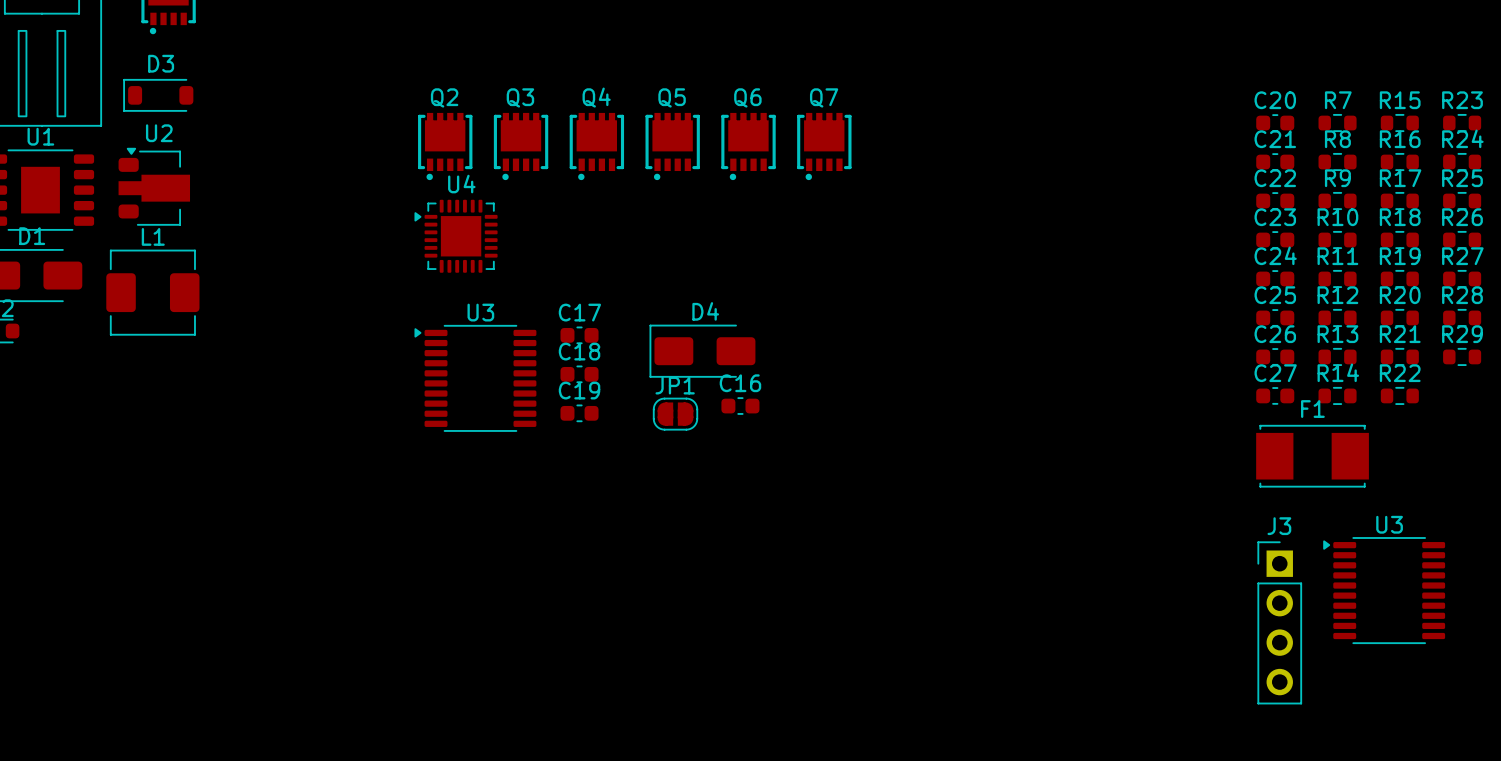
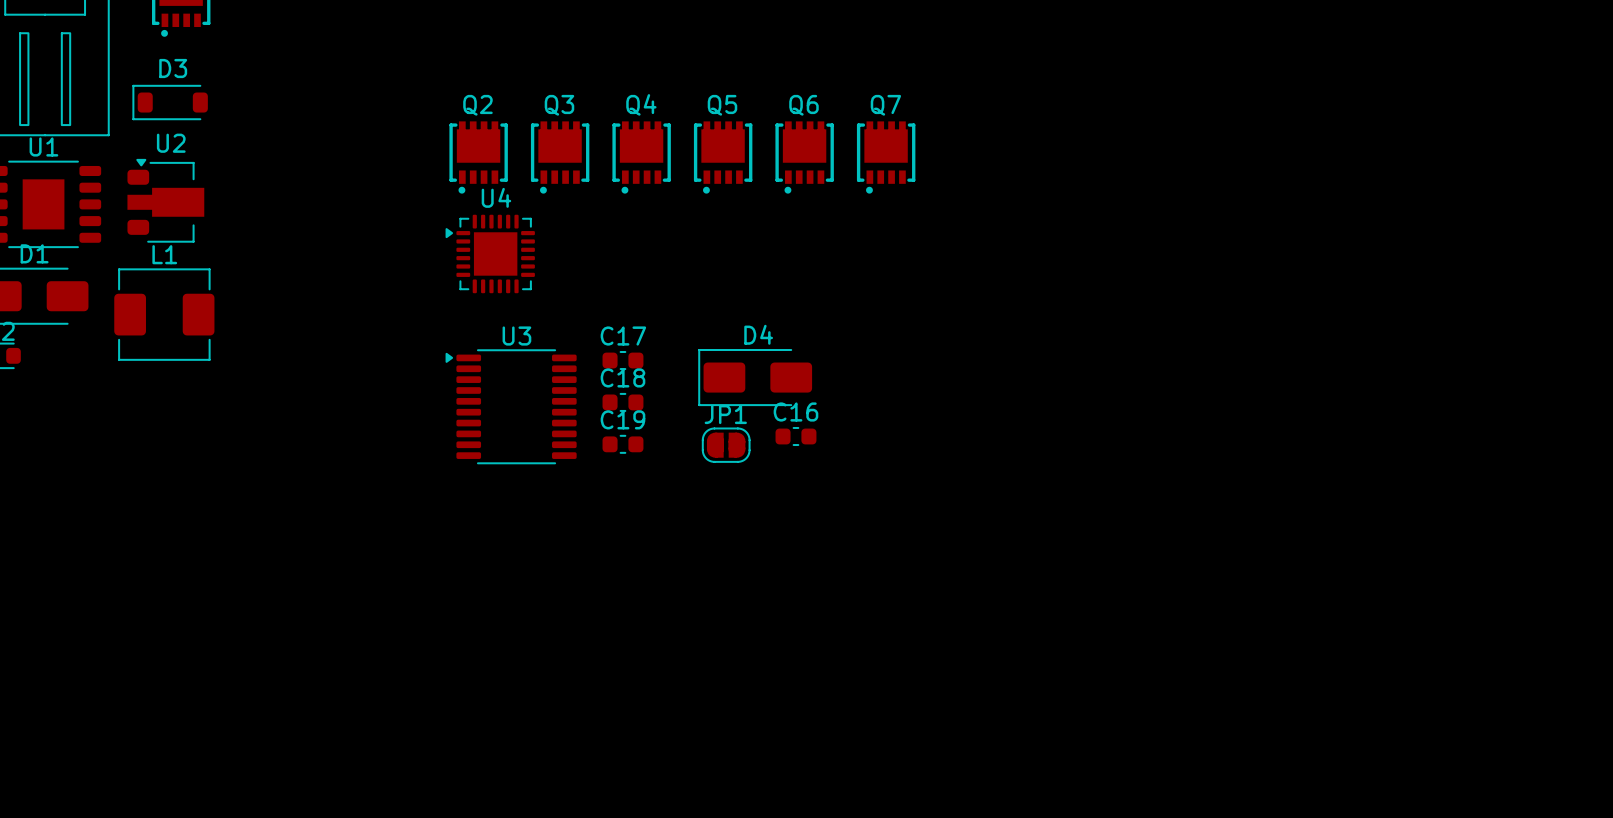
C20: (1275, 123) -> none
R7: (1337, 123) -> none
R15: (1399, 123) -> none
R23: (1462, 123) -> none
C21: (1275, 162) -> none
R8: (1337, 162) -> none
R16: (1399, 162) -> none
R24: (1462, 162) -> none
C22: (1275, 200) -> none
R9: (1337, 200) -> none
R17: (1399, 200) -> none
R25: (1462, 200) -> none
C23: (1275, 239) -> none
R10: (1337, 239) -> none
R18: (1399, 239) -> none
R26: (1462, 239) -> none
C24: (1275, 278) -> none
R11: (1337, 278) -> none
R19: (1399, 278) -> none
R27: (1462, 278) -> none
C25: (1275, 317) -> none
R12: (1337, 317) -> none
R20: (1399, 317) -> none
R28: (1462, 317) -> none
C26: (1275, 356) -> none
R13: (1337, 356) -> none
R21: (1399, 356) -> none
R29: (1462, 356) -> none
C27: (1275, 395) -> none
R14: (1337, 395) -> none
R22: (1399, 395) -> none
F1: (1312, 456) -> none
U3: (1384, 590) -> none
J3: (1279, 622) -> none

